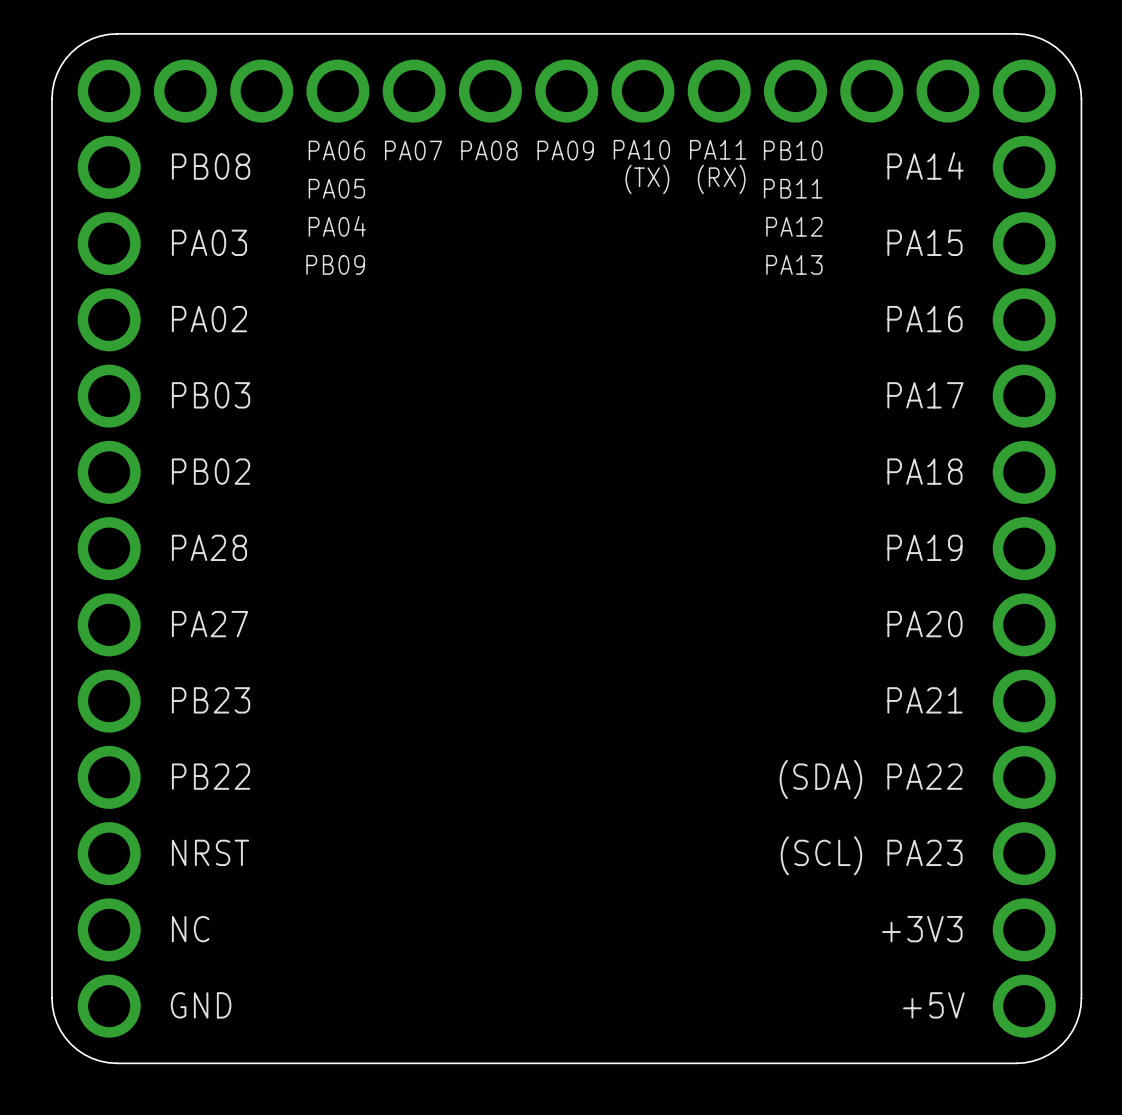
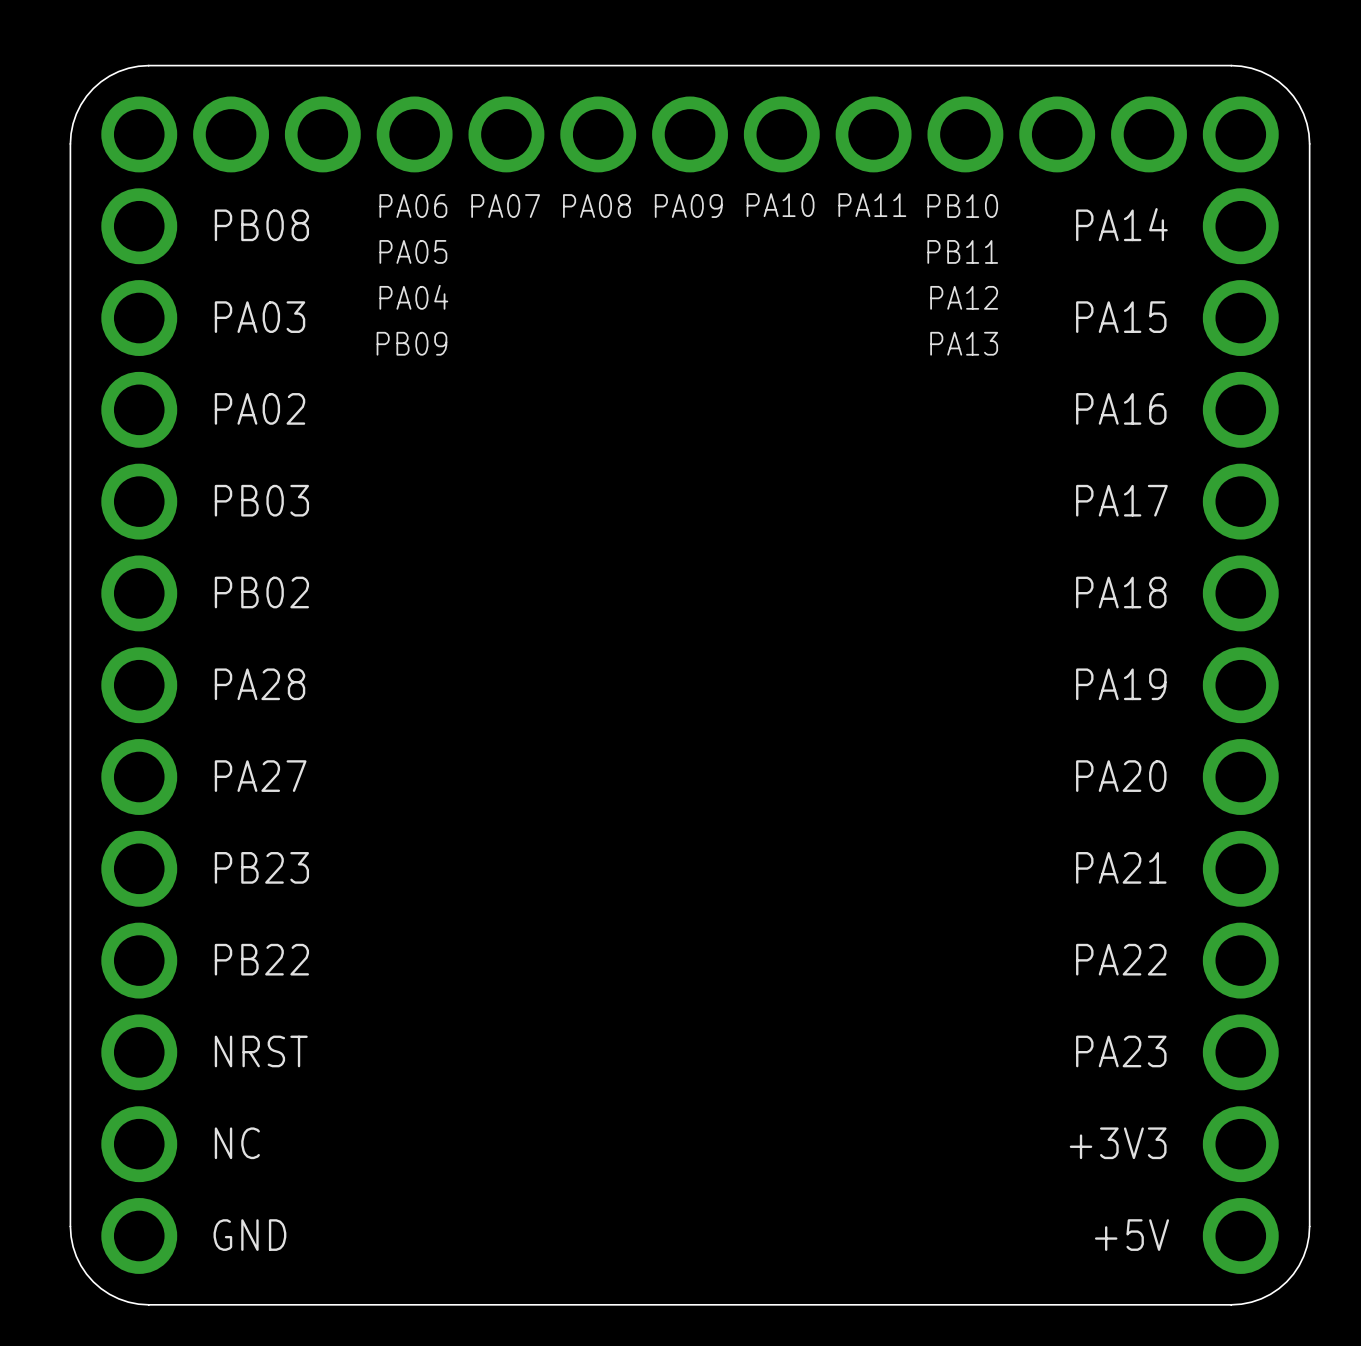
text: (TX) (647, 179) -> none
text: (RX) (721, 179) -> none
text: (SDA) PA22 (871, 779) -> PA22 (1121, 959)
text: (SCL) PA23 (871, 855) -> PA23 (1121, 1051)

